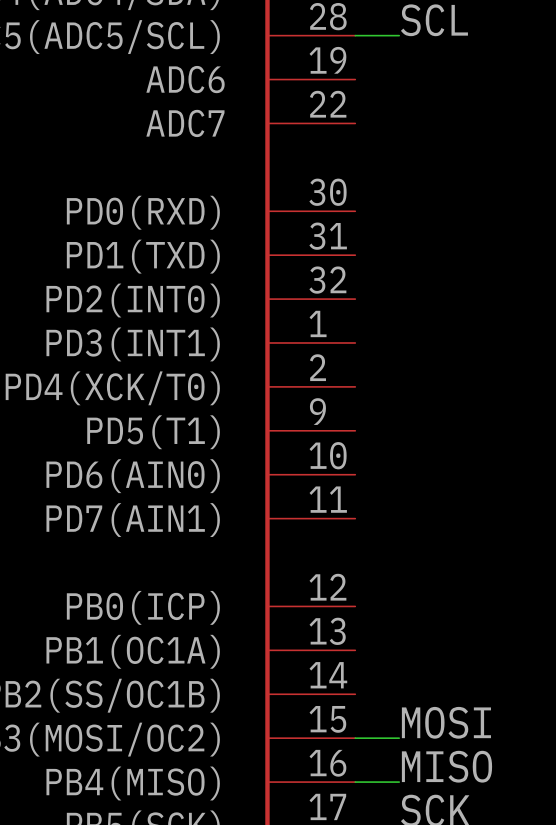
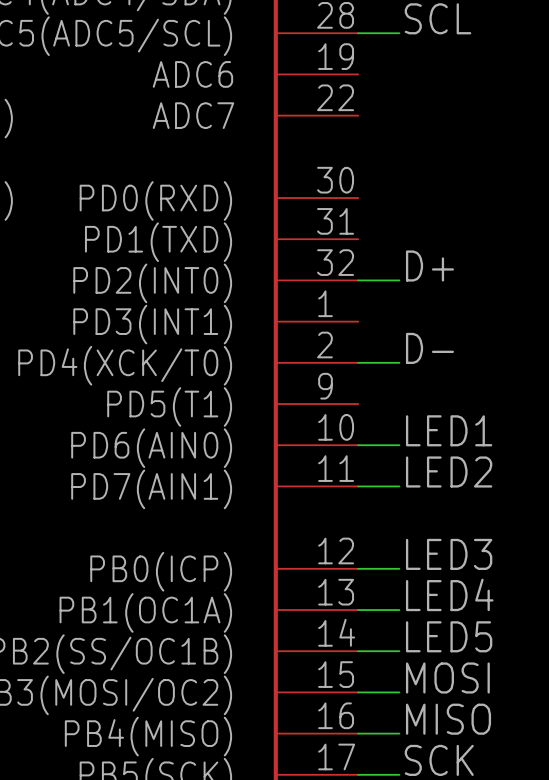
label: none -> D+ (429, 266)
wire: none -> (358, 280) (399, 280)
label: none -> D- (429, 348)
wire: none -> (358, 362) (399, 362)
label: none -> LED1 (449, 430)
wire: none -> (358, 445) (399, 445)
label: none -> LED2 (449, 472)
wire: none -> (358, 486) (399, 486)
label: none -> LED3 (449, 554)
wire: none -> (358, 568) (399, 568)
label: none -> LED4 (449, 594)
wire: none -> (358, 610) (399, 610)
label: none -> LED5 (449, 636)
wire: none -> (358, 651) (399, 651)

